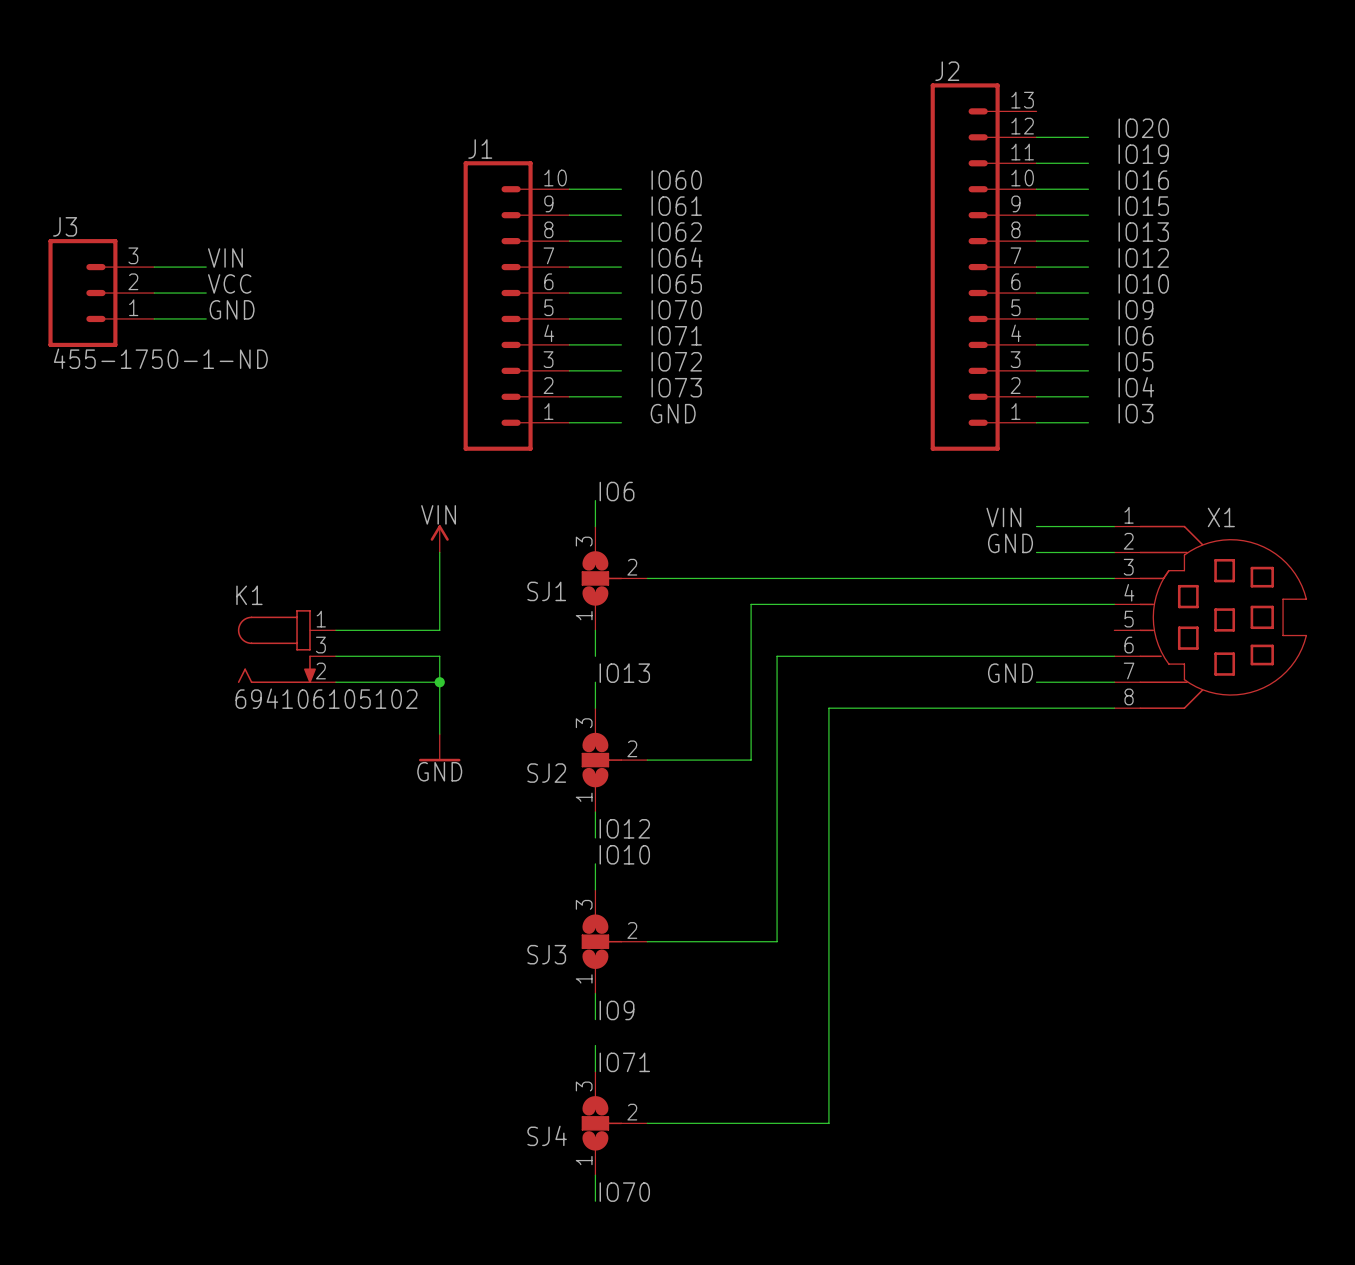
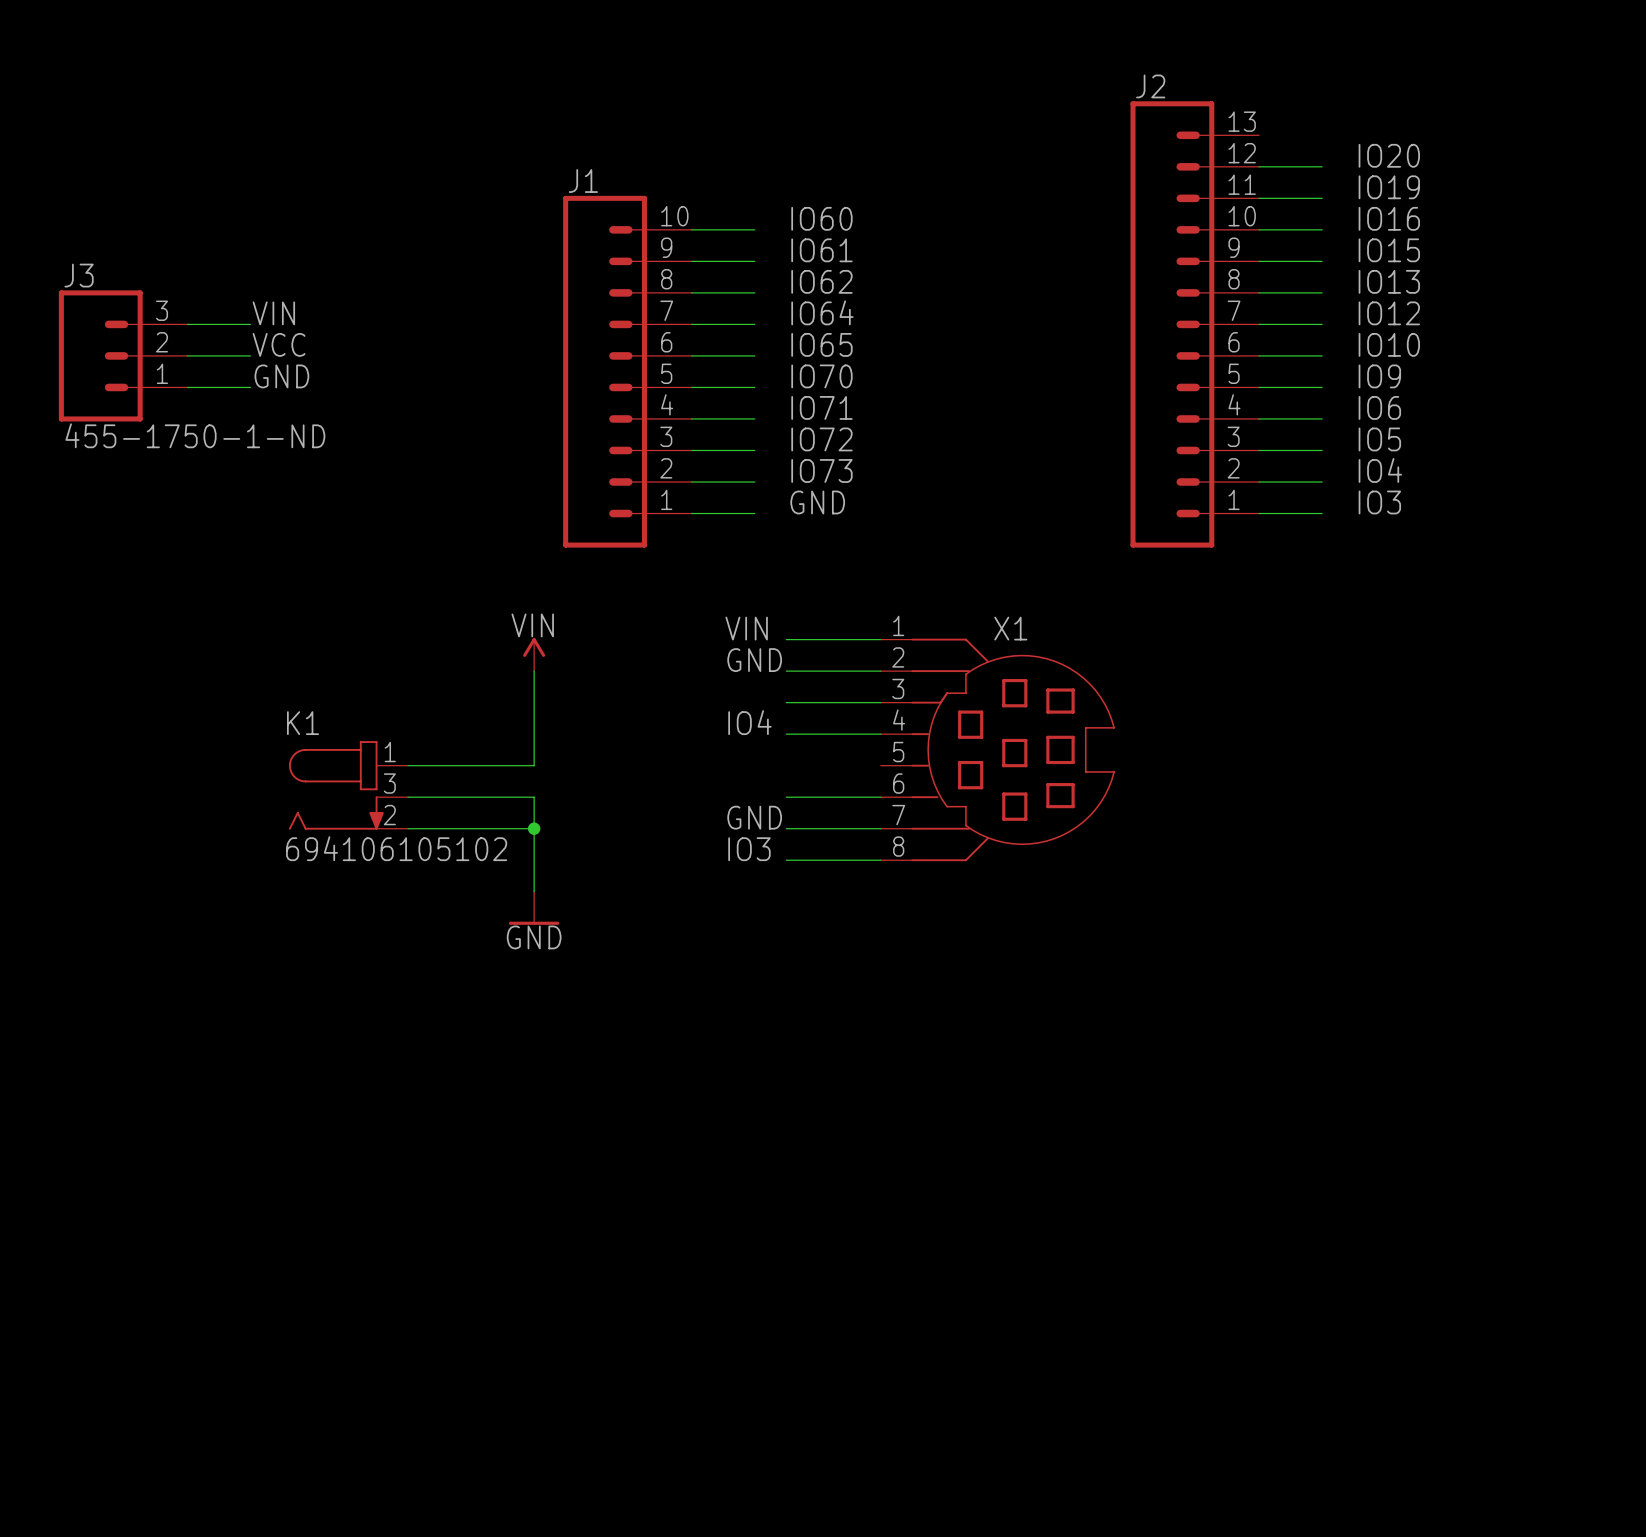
label: IO6 (617, 491) -> none
wire: (595, 500) (595, 526) -> none
label: none -> VIN (746, 628)
label: VIN (1003, 517) -> none
wire: none -> (786, 639) (880, 639)
wire: (1036, 526) (1114, 526) -> none
label: none -> GND (754, 660)
label: GND (1010, 543) -> none
wire: none -> (786, 671) (880, 671)
wire: (1036, 552) (1114, 552) -> none
SJ1: (614, 578) -> none
wire: (725, 578) (1114, 578) -> none
label: none -> IO4 (749, 722)
wire: none -> (786, 734) (880, 734)
wire: (1114, 604) (751, 604) (751, 760) (647, 760) -> none
X1 position: (1210, 617) -> (997, 749)
wire: (595, 630) (595, 656) -> none
wire: none -> (786, 797) (880, 797)
wire: (1114, 656) (777, 656) (777, 941) (647, 941) -> none
label: IO13 (624, 673) -> GND (754, 817)
label: GND (1010, 673) -> none
wire: (595, 682) (595, 708) -> none
wire: none -> (786, 828) (880, 828)
wire: (1036, 682) (1114, 682) -> none
label: none -> IO3 (749, 849)
wire: none -> (786, 860) (880, 860)
wire: (1114, 708) (828, 708) (828, 1123) (647, 1123) -> none
SJ2: (614, 760) -> none
wire: (595, 811) (595, 837) -> none
label: IO12 (624, 828) -> none
label: IO10 (624, 854) -> none
wire: (595, 863) (595, 889) -> none
SJ3: (614, 941) -> none
wire: (595, 993) (595, 1019) -> none
label: IO9 (617, 1010) -> none
wire: (595, 1045) (595, 1071) -> none
label: IO71 (624, 1062) -> none
SJ4: (614, 1123) -> none
wire: (595, 1175) (595, 1201) -> none
label: IO70 (624, 1192) -> none

